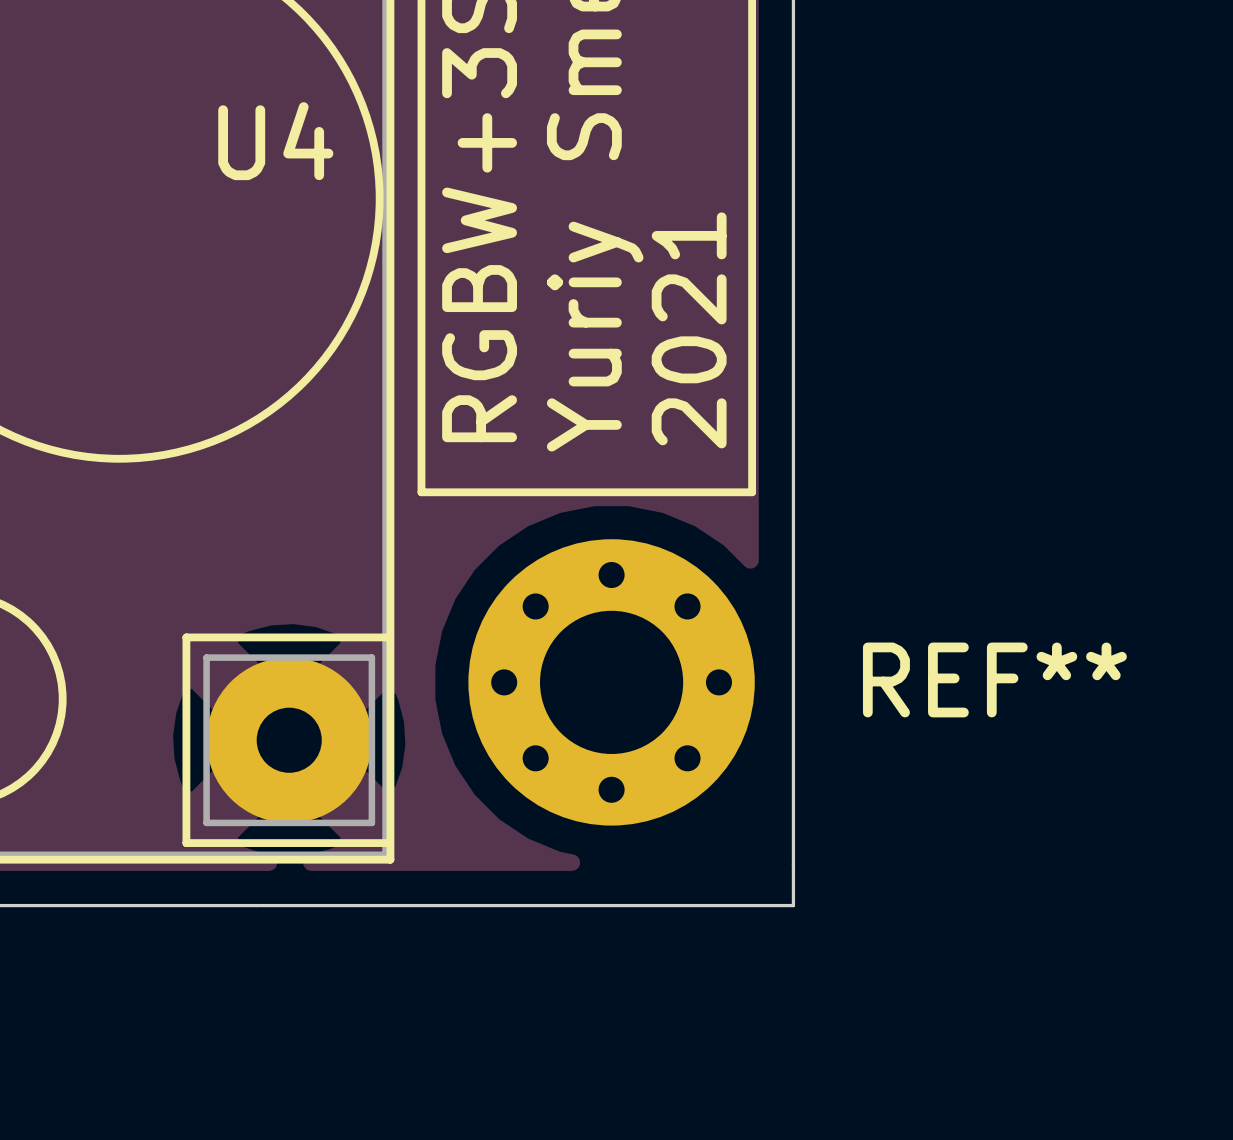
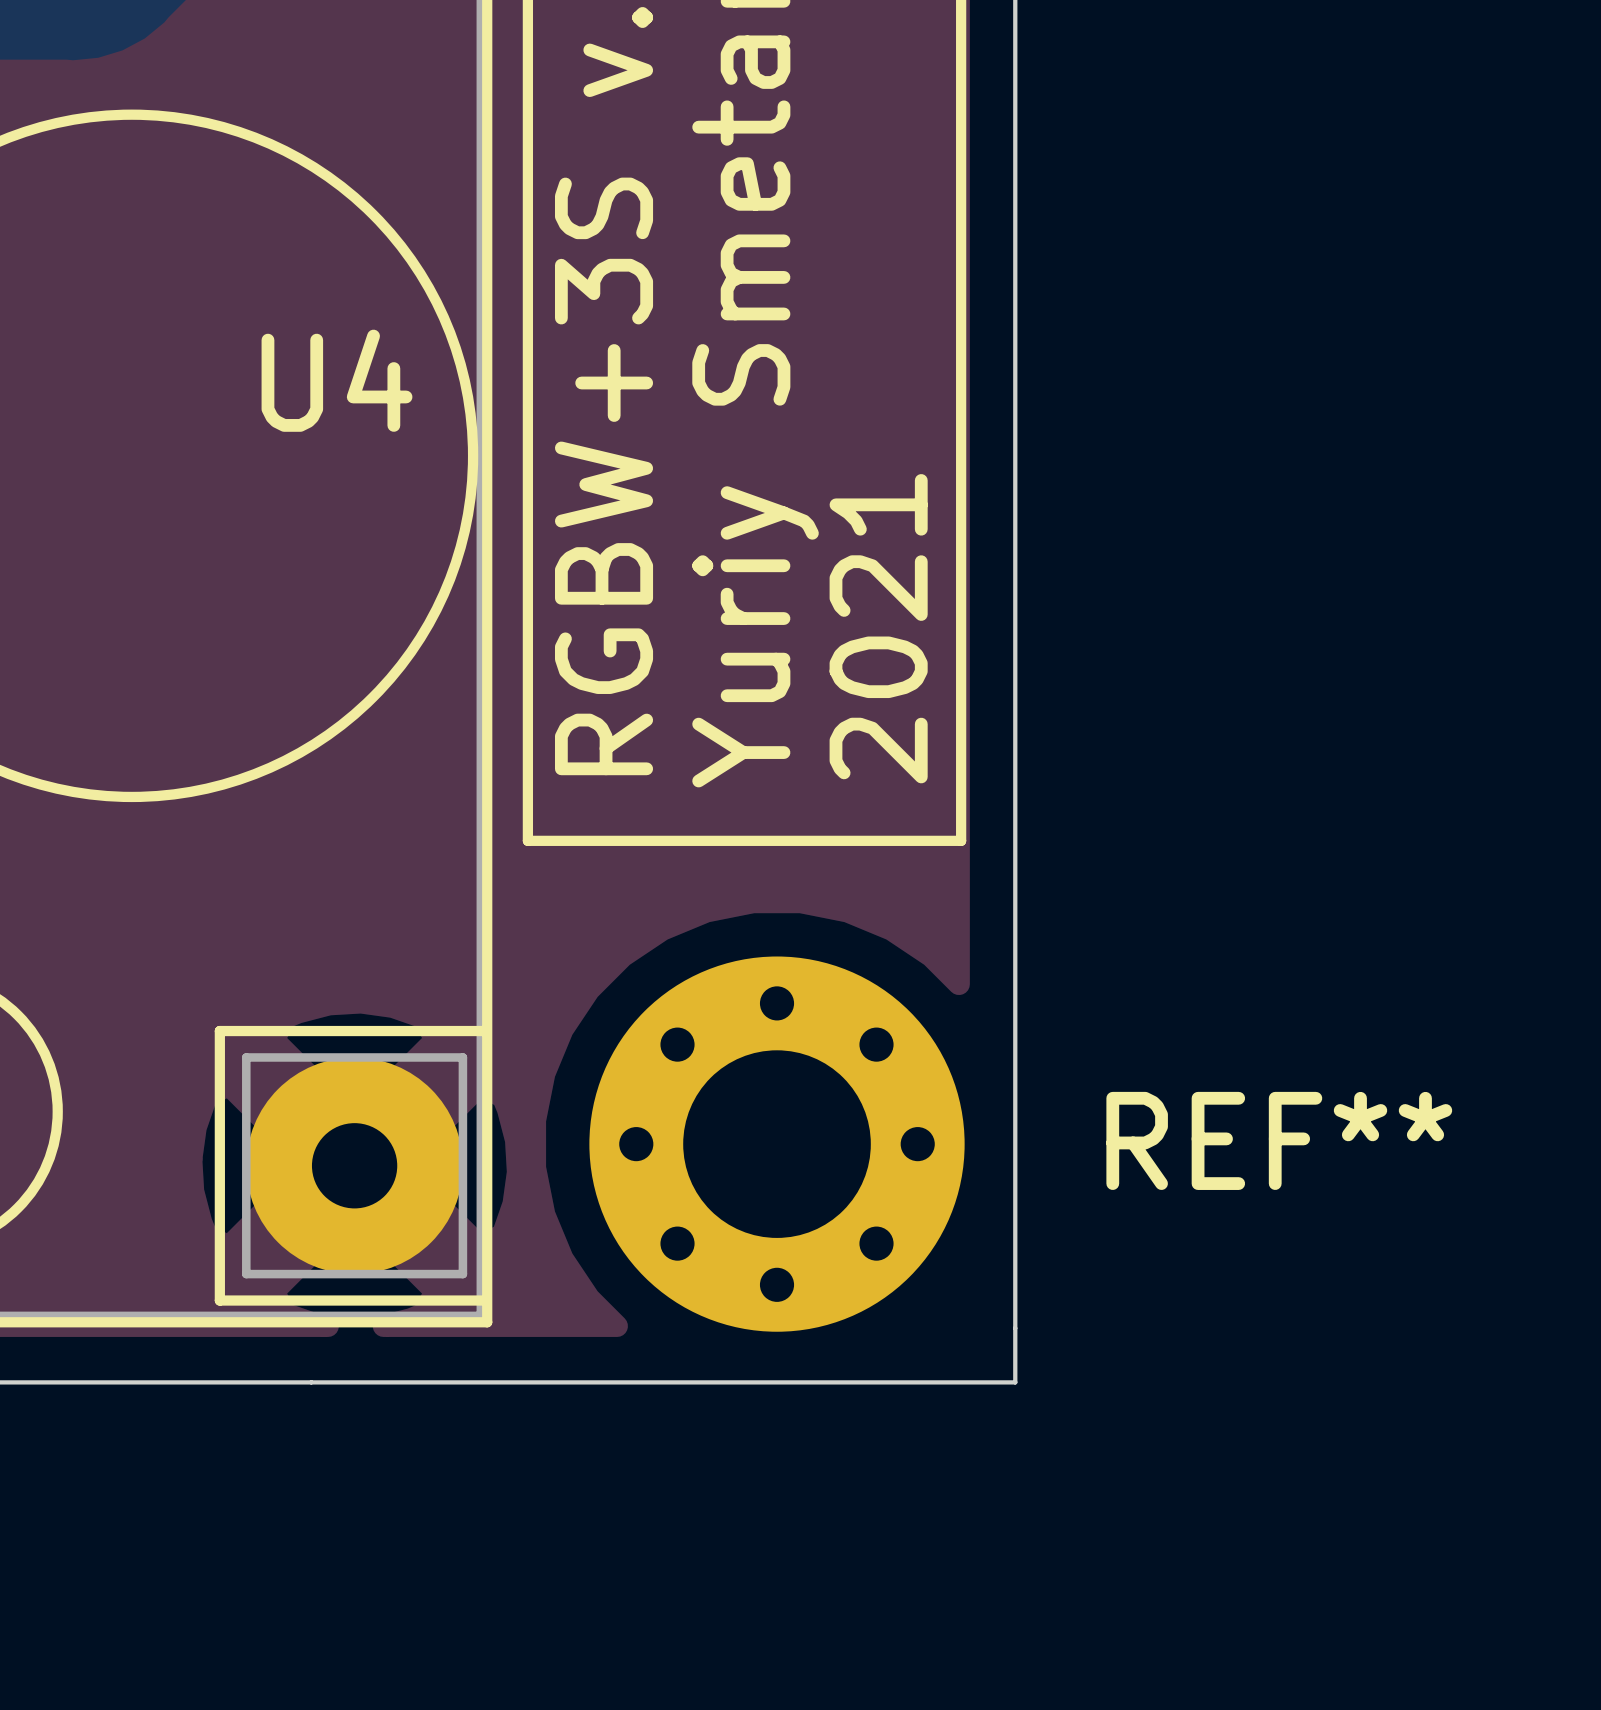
REF** position: (611, 682) -> (777, 1144)

